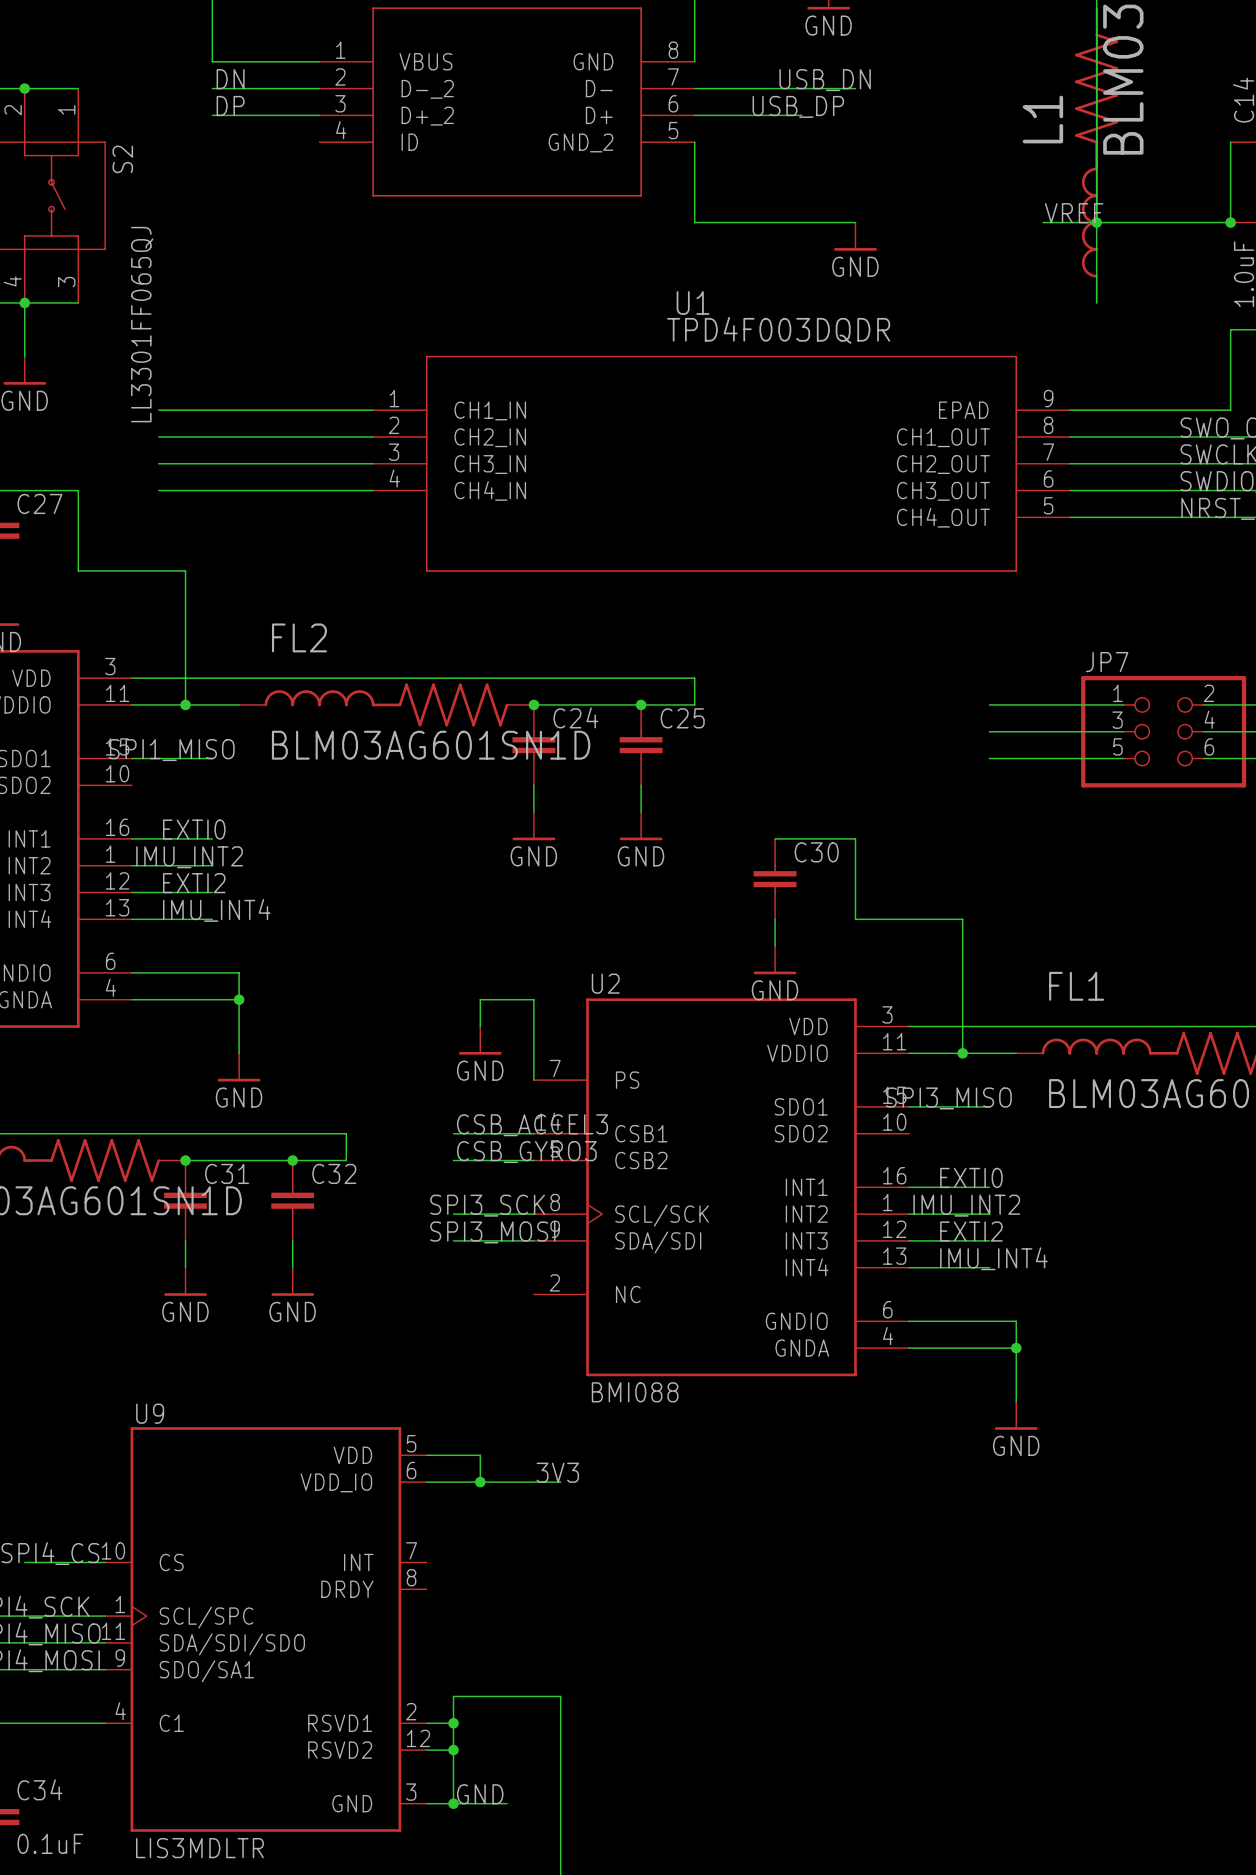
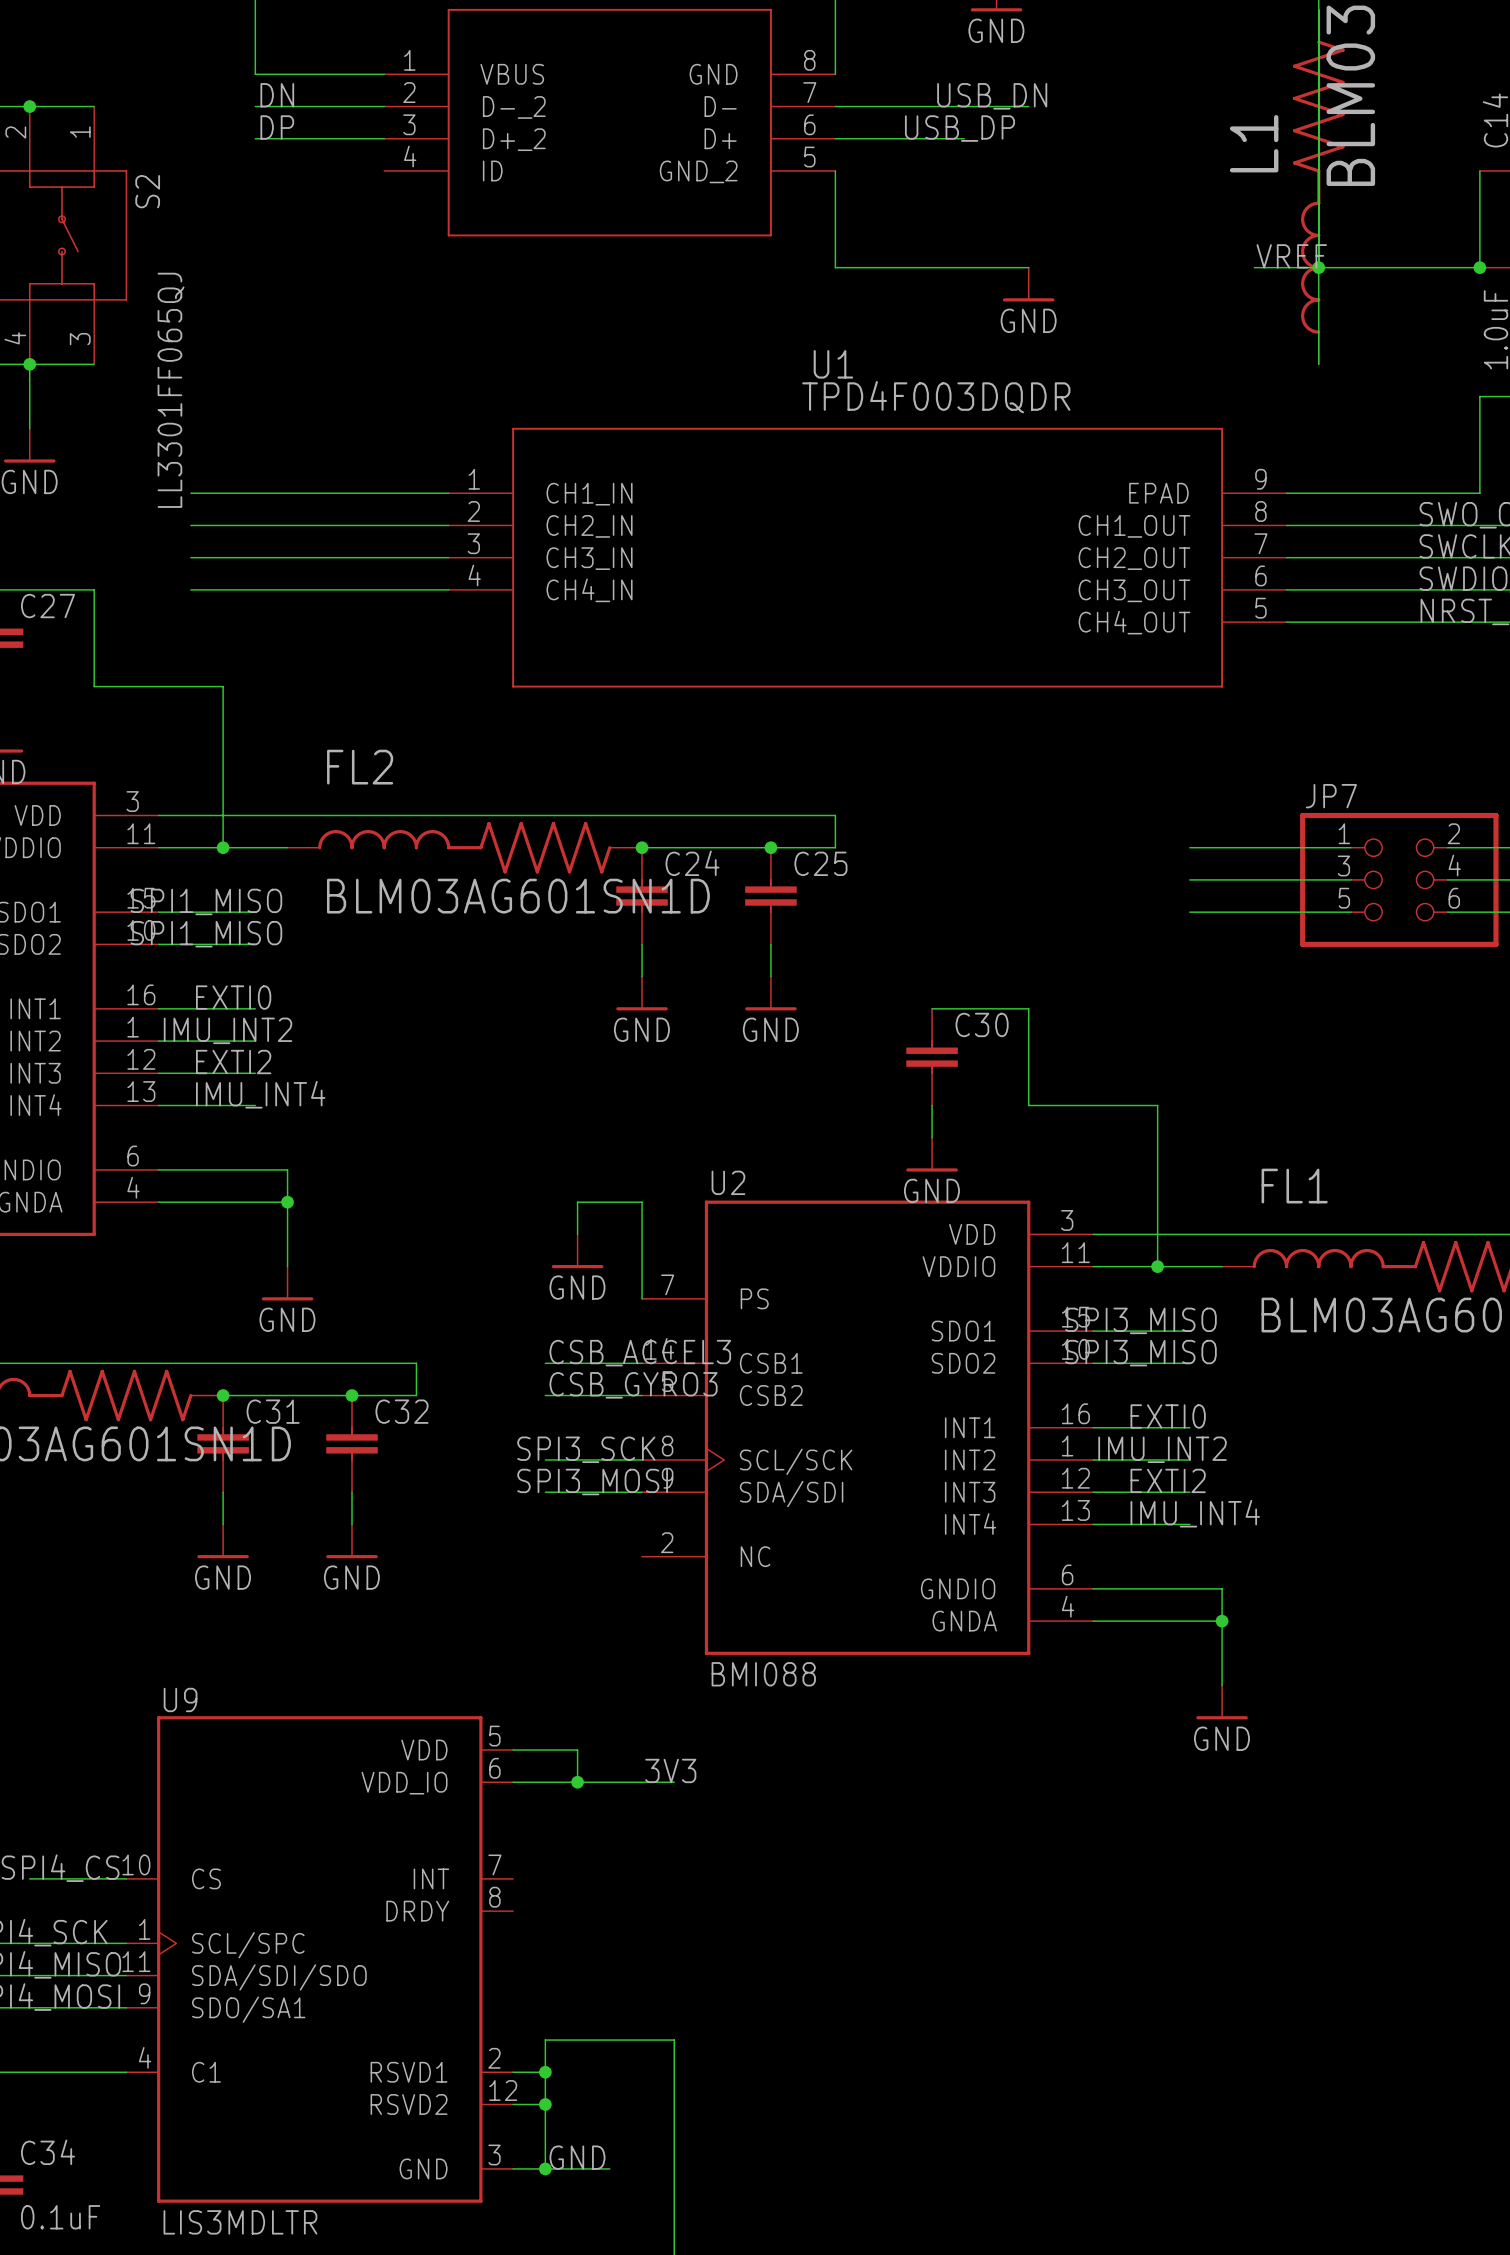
label: none -> SPI1_MISO (206, 934)
wire: none -> (158, 944) (255, 944)
label: none -> SPI3_MISO (1140, 1353)
wire: none -> (1093, 1363) (1189, 1363)

